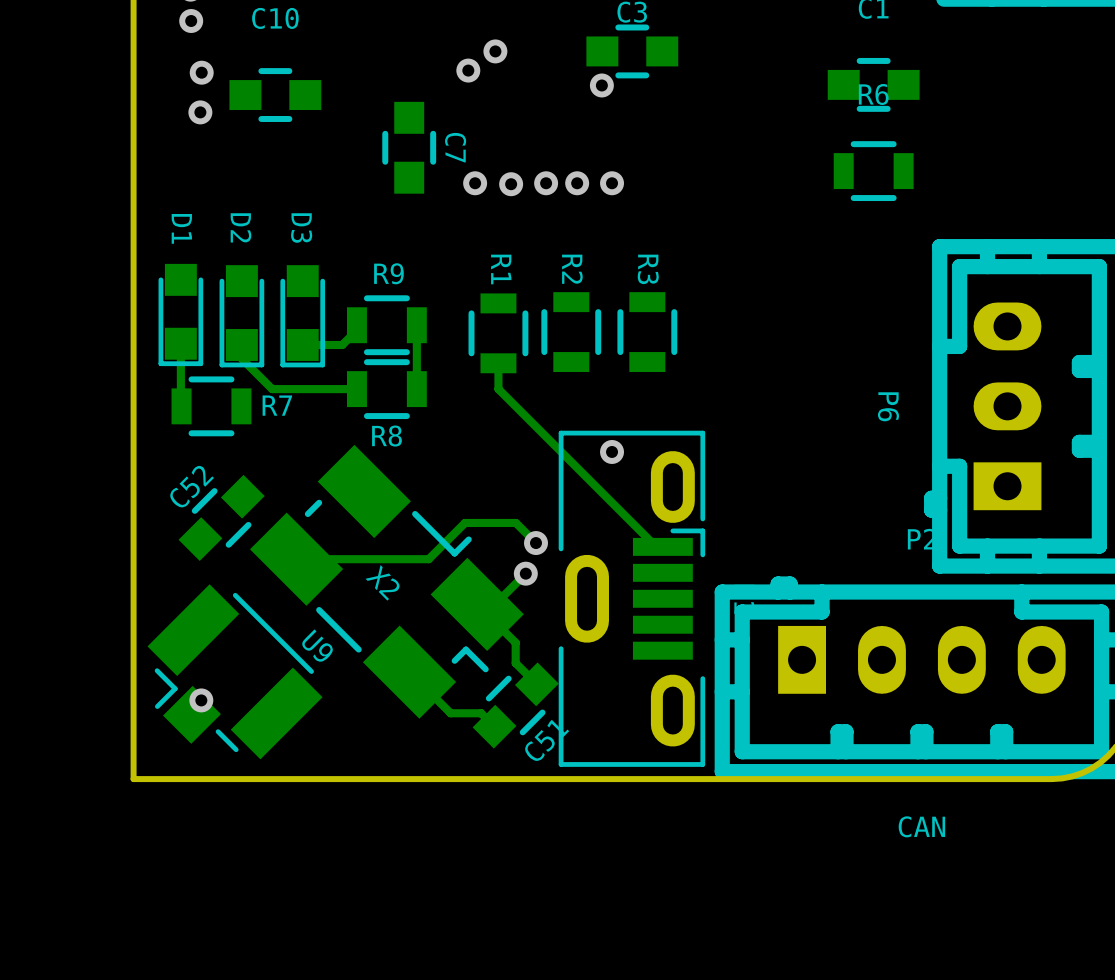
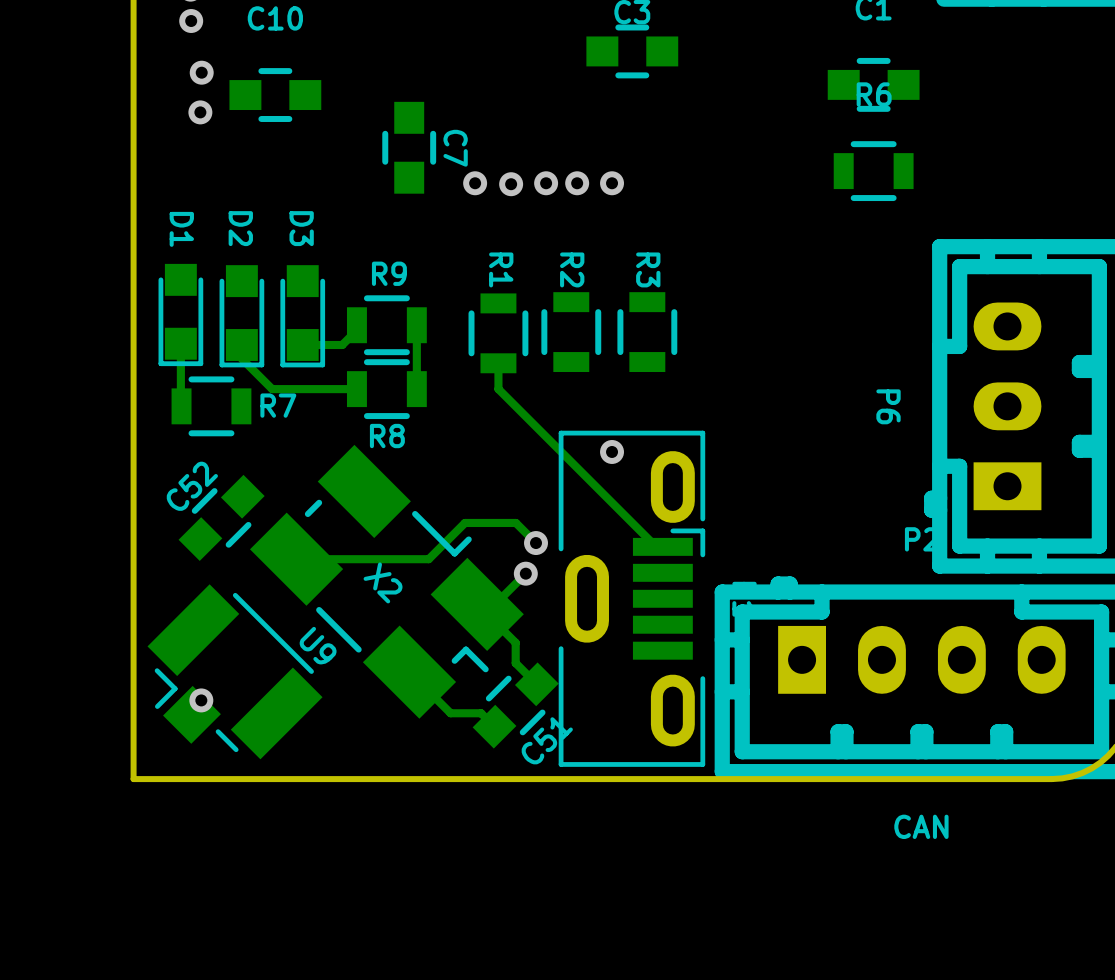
via: (495, 51) -> none
via: (468, 70) -> none
via: (601, 85) -> none

